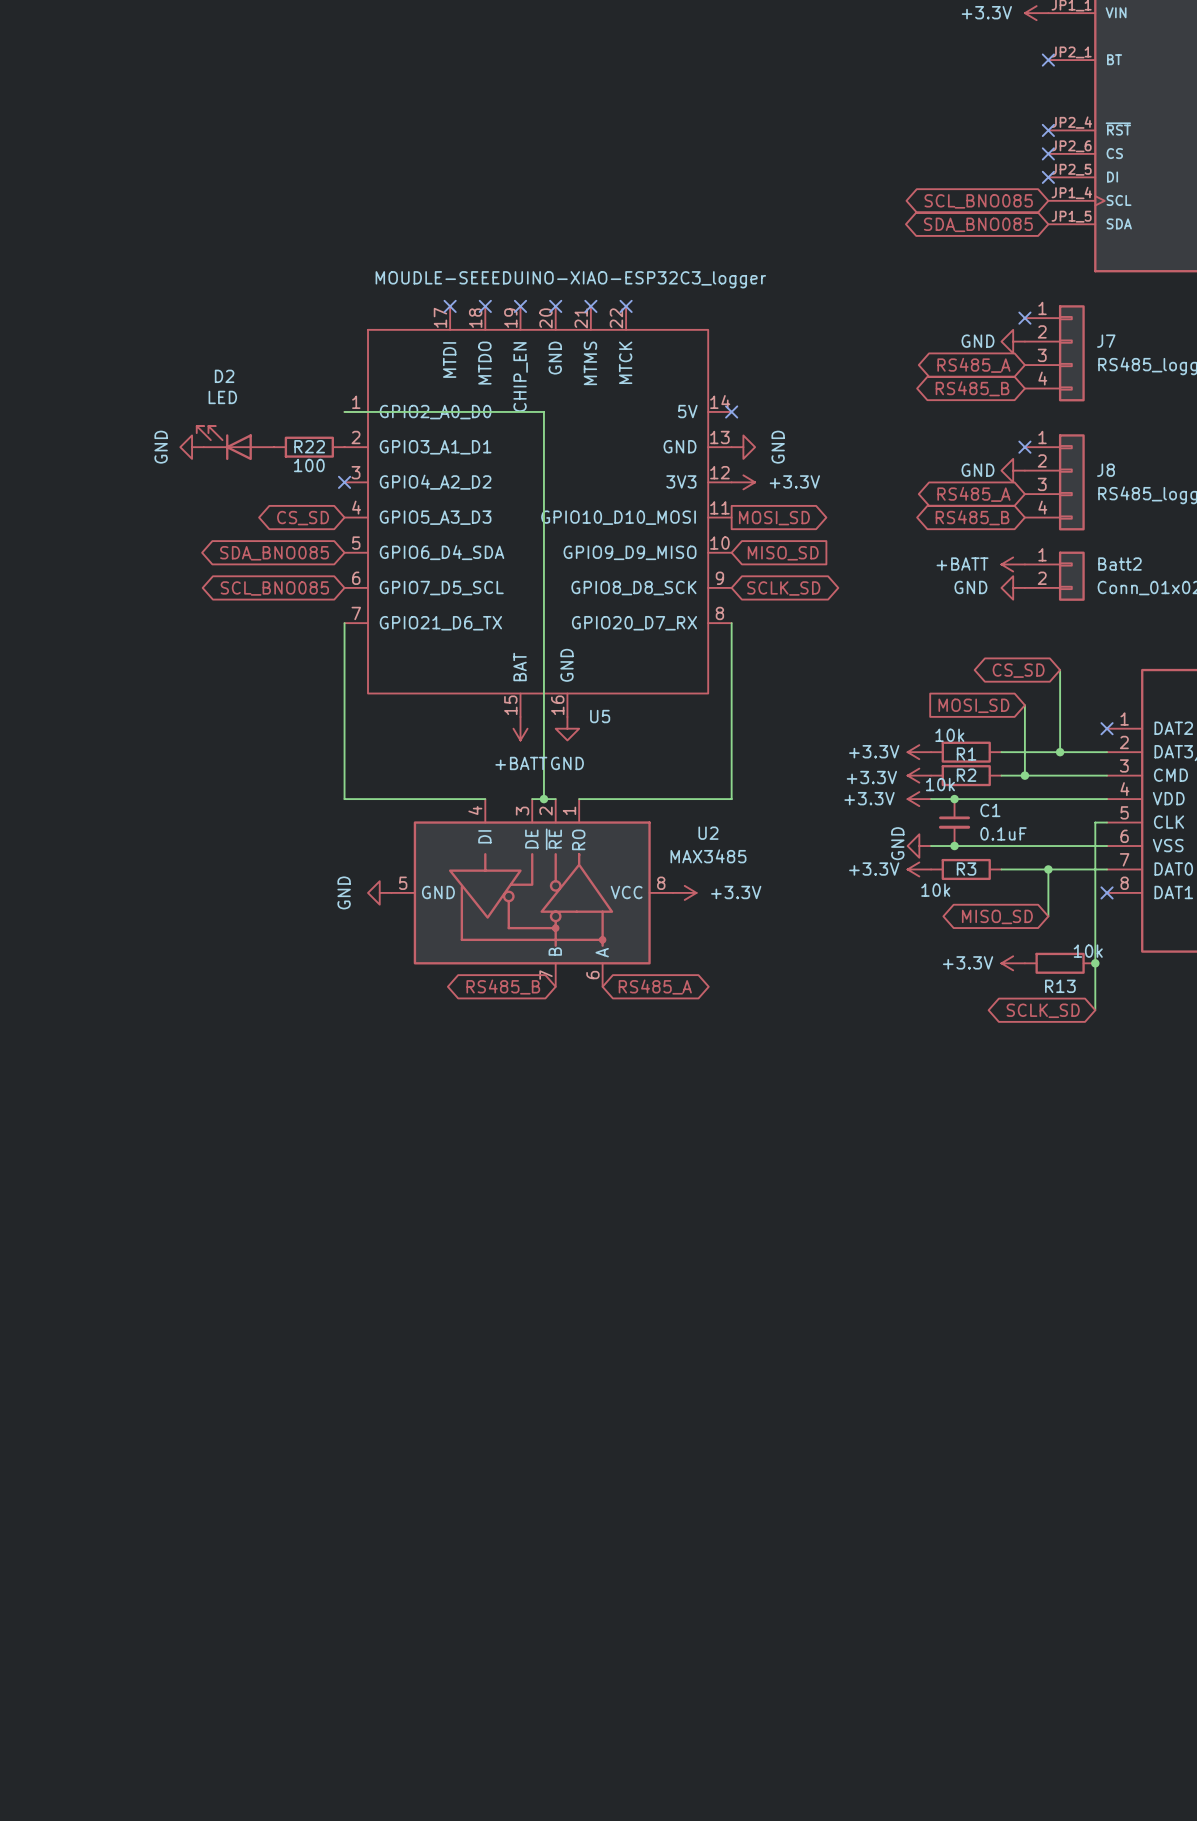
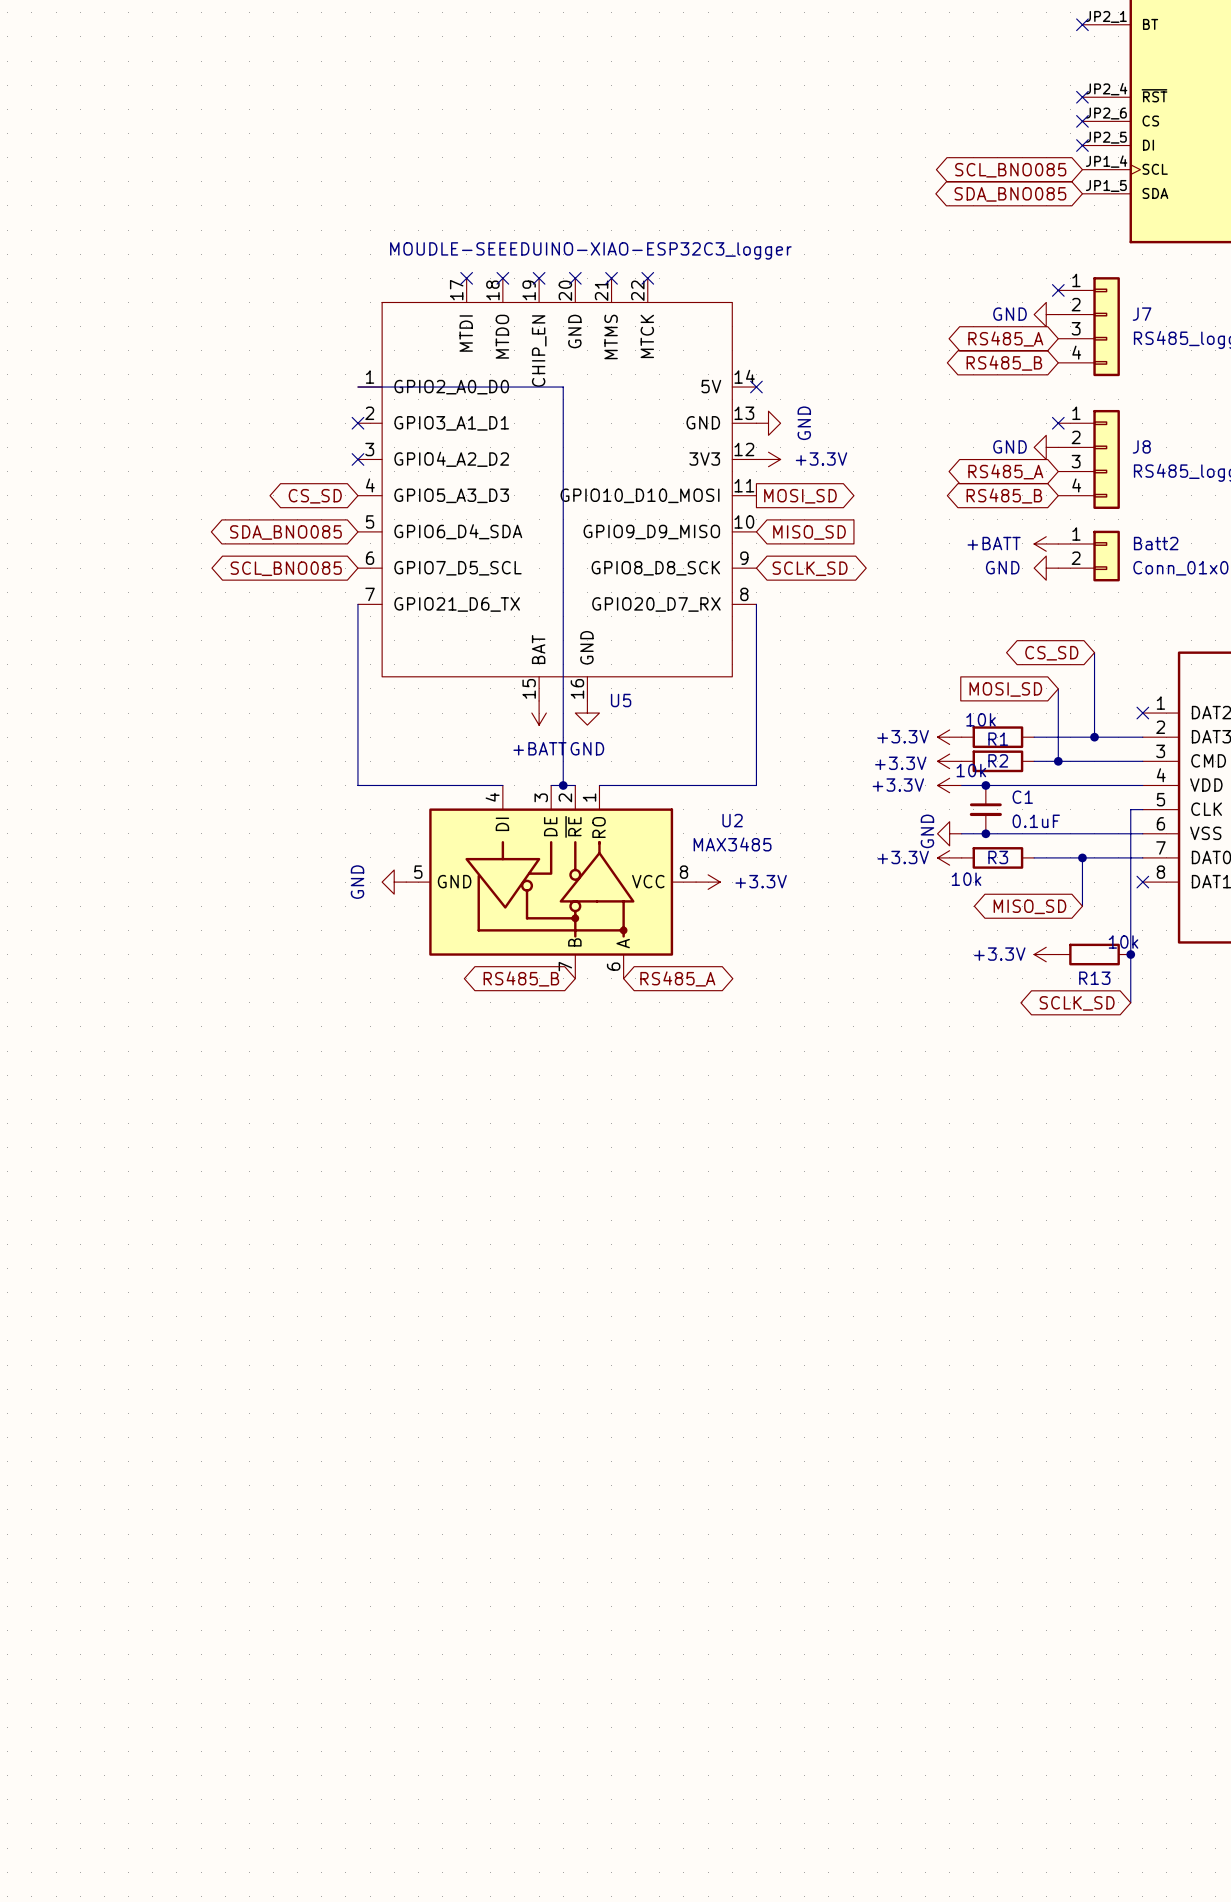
D2: LED (235, 443) -> none
power symbol: GND (192, 447) -> none
R22: 100 (309, 447) -> none
no-connect mark: none -> (357, 423)

